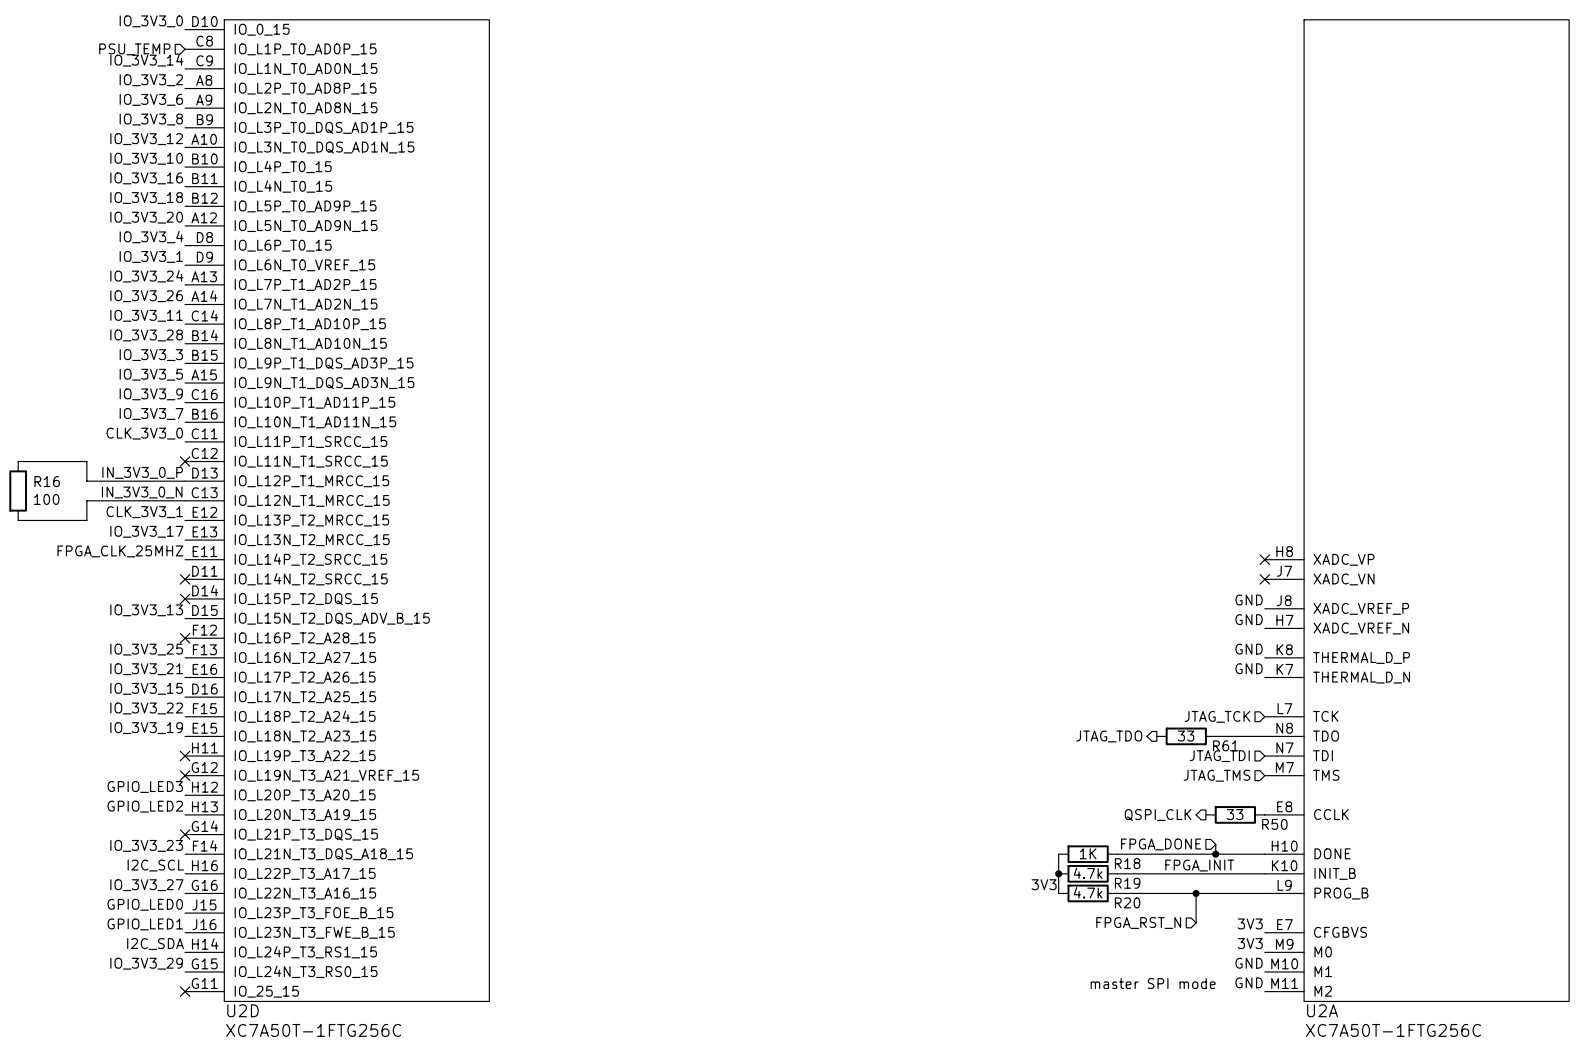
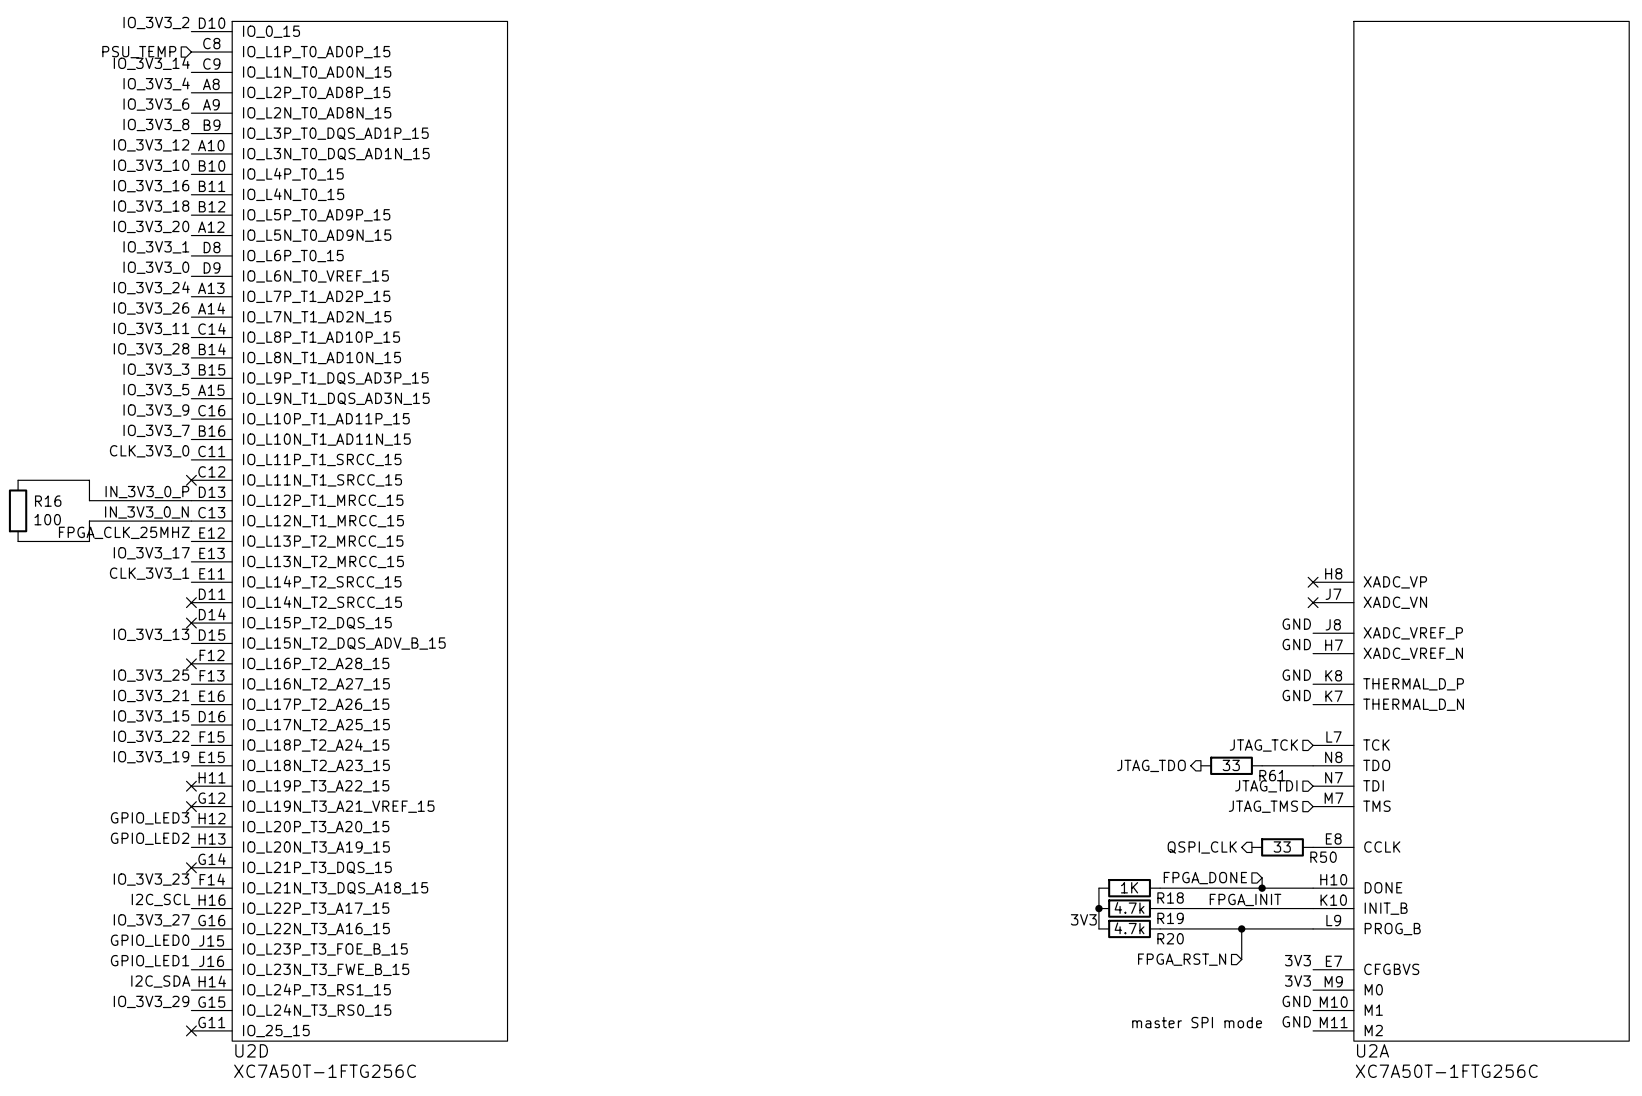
label: IO_3V3_0 (151, 21) -> IO_3V3_2 (156, 23)
label: IO_3V3_2 (151, 80) -> IO_3V3_4 (156, 83)
label: IO_3V3_4 (151, 237) -> IO_3V3_1 (156, 247)
label: IO_3V3_1 (151, 256) -> IO_3V3_0 (156, 267)
label: CLK_3V3_1 (144, 512) -> FPGA_CLK_25MHZ (124, 532)
label: FPGA_CLK_25MHZ (120, 551) -> CLK_3V3_1 (149, 573)

